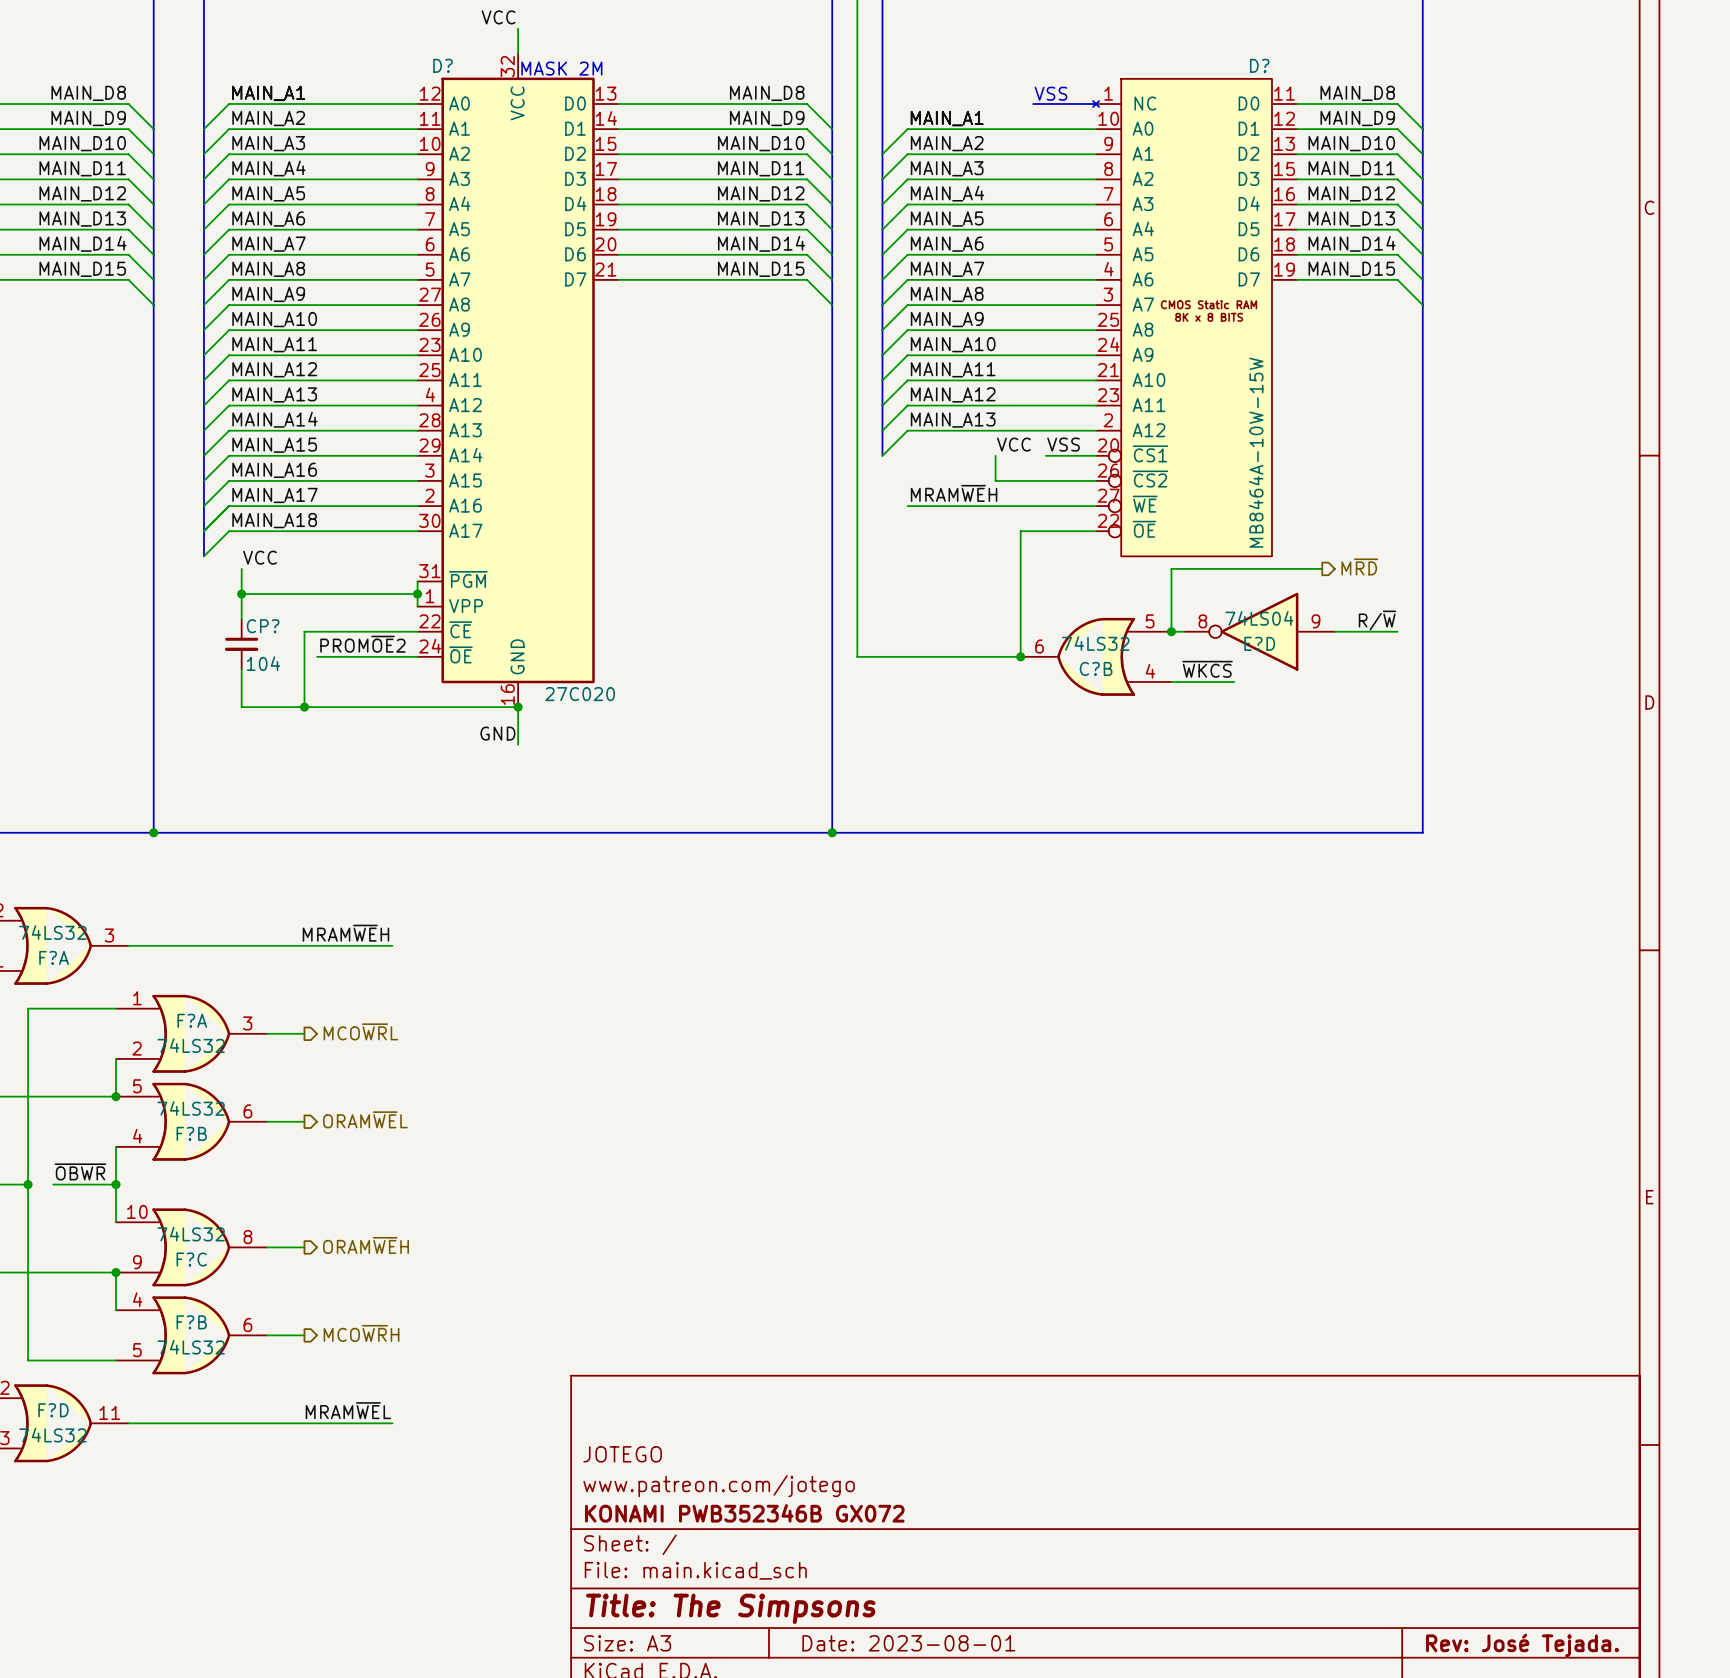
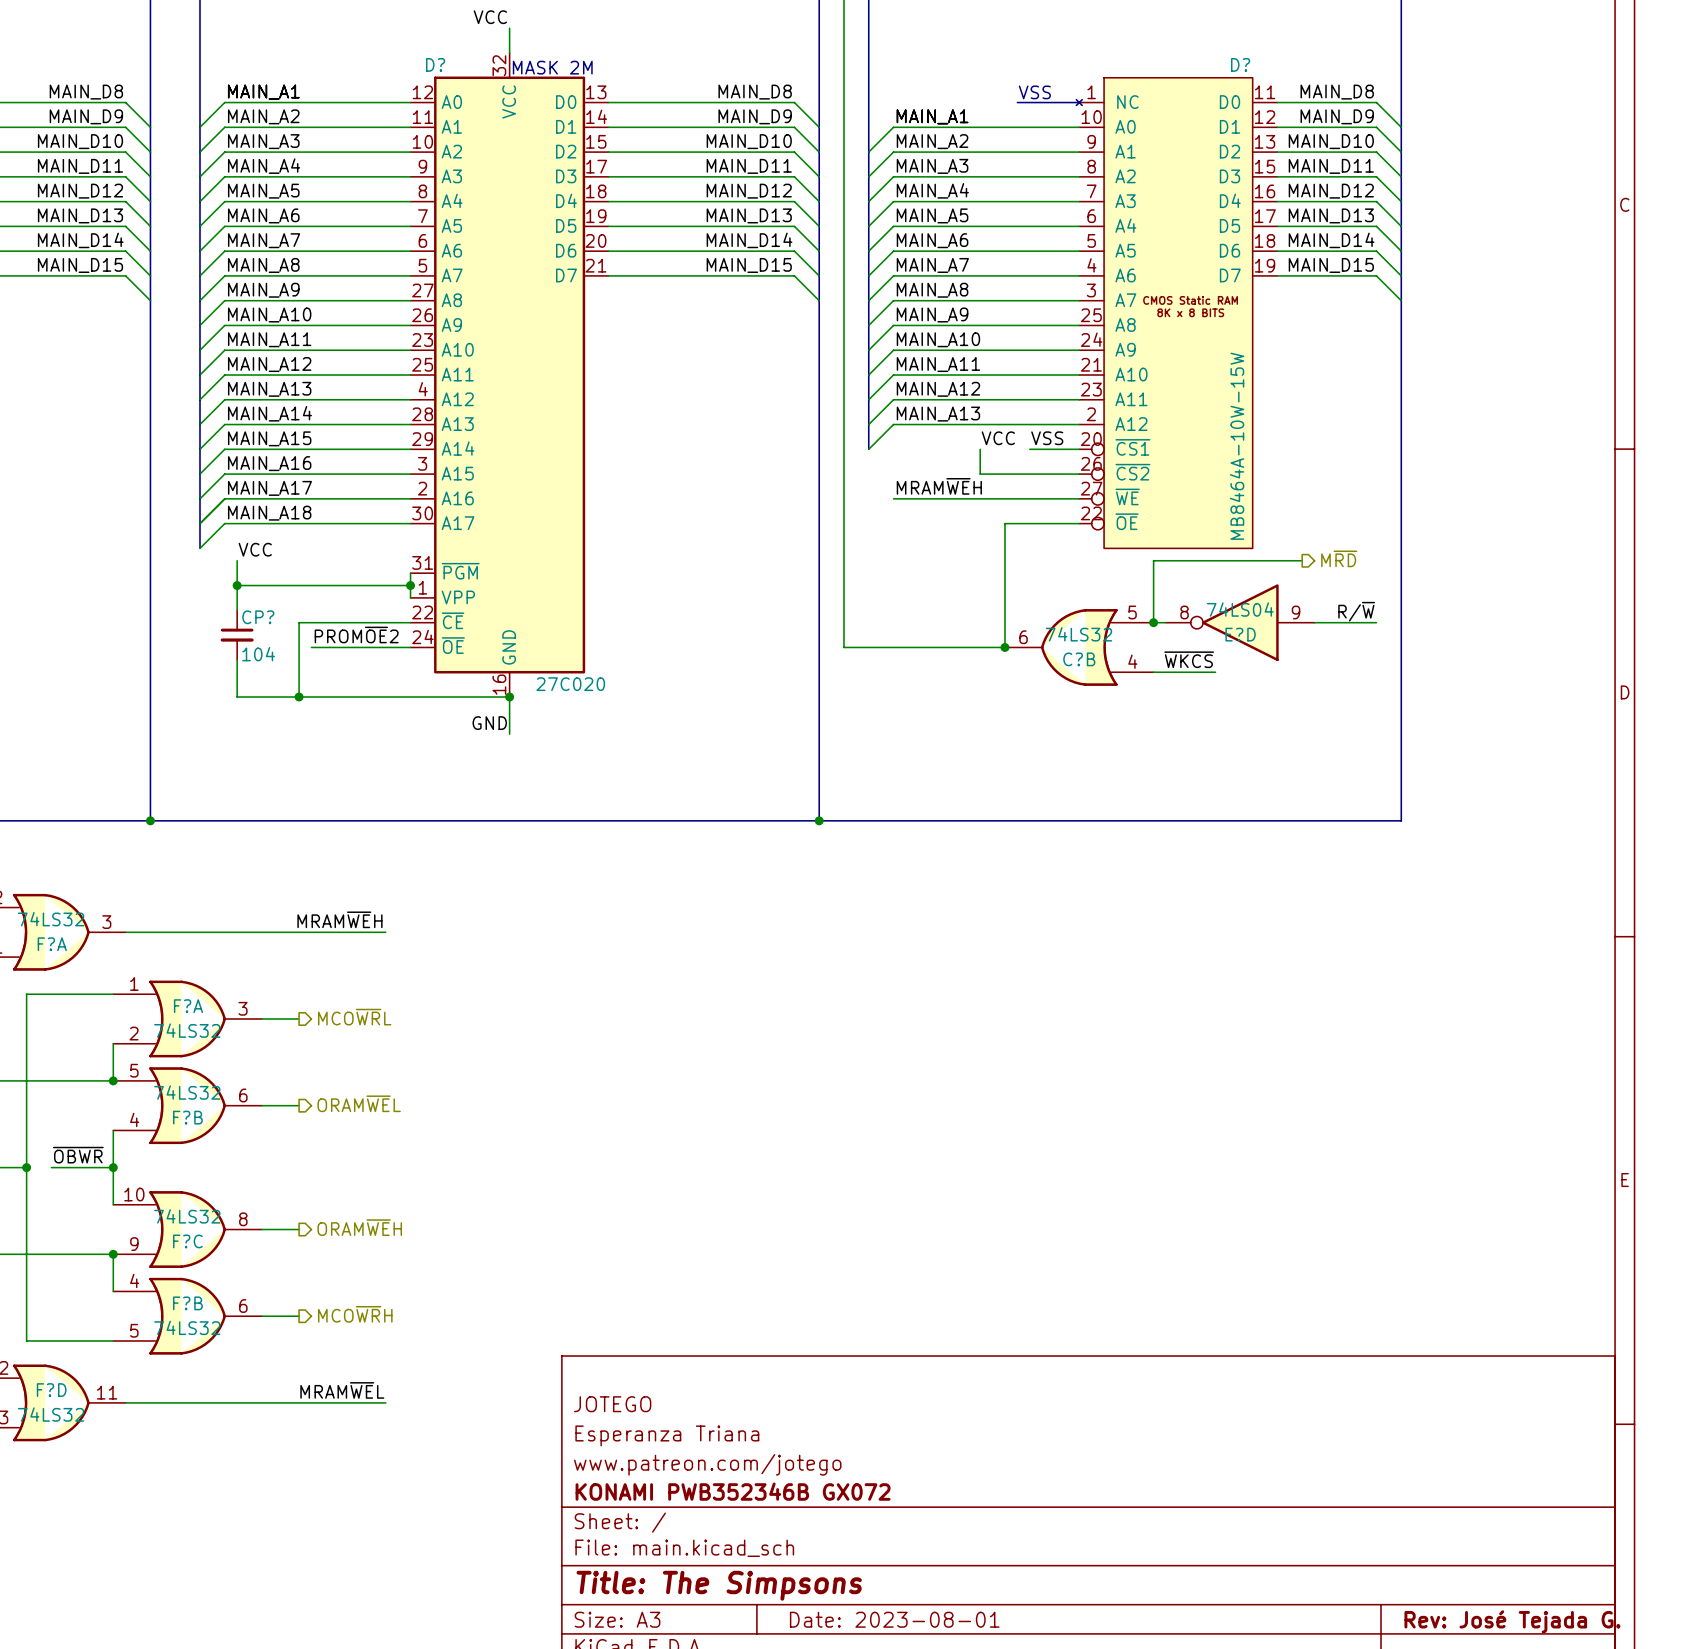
title block: none -> JOTEGO (612, 1404)
title block: JOTEGO (622, 1454) -> Esperanza Triana (667, 1435)
title block: Rev: José Tejada. (1522, 1645) -> Rev: José Tejada G. (1512, 1621)

